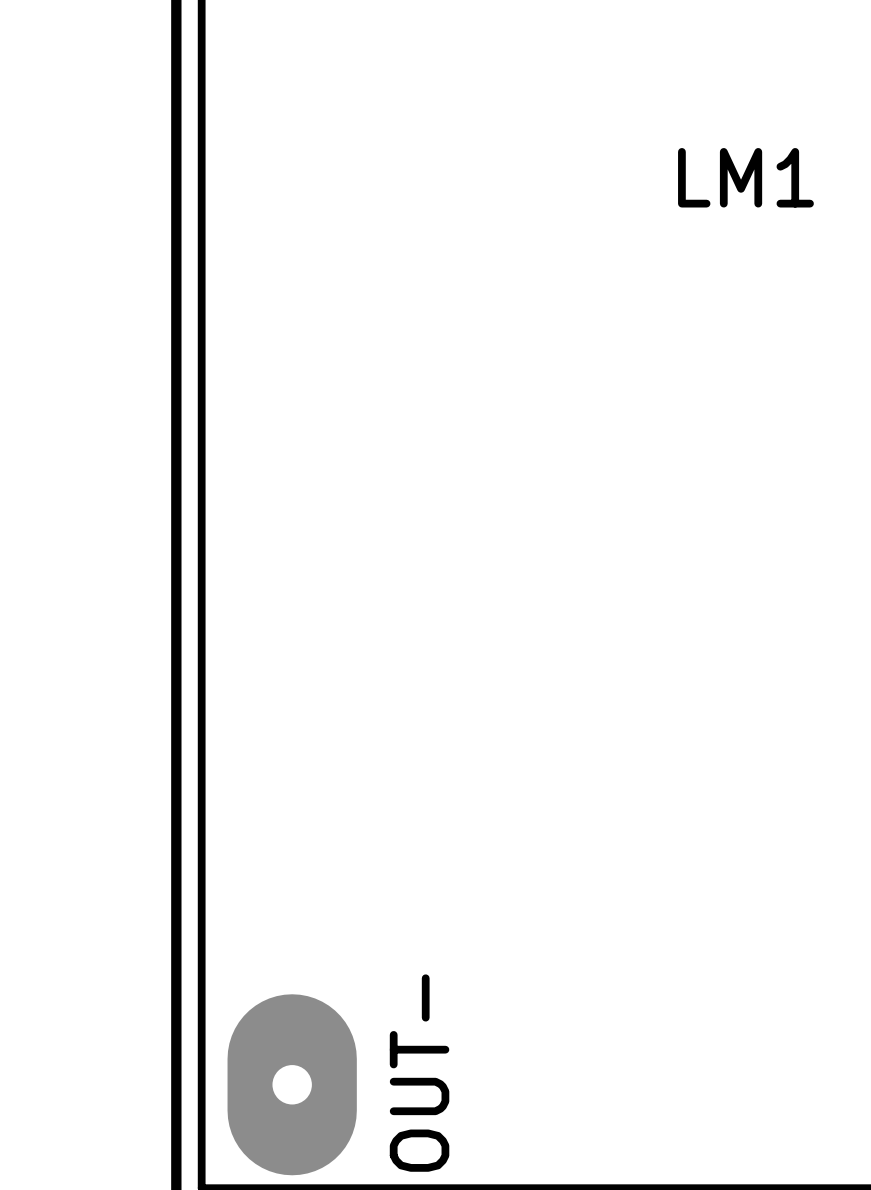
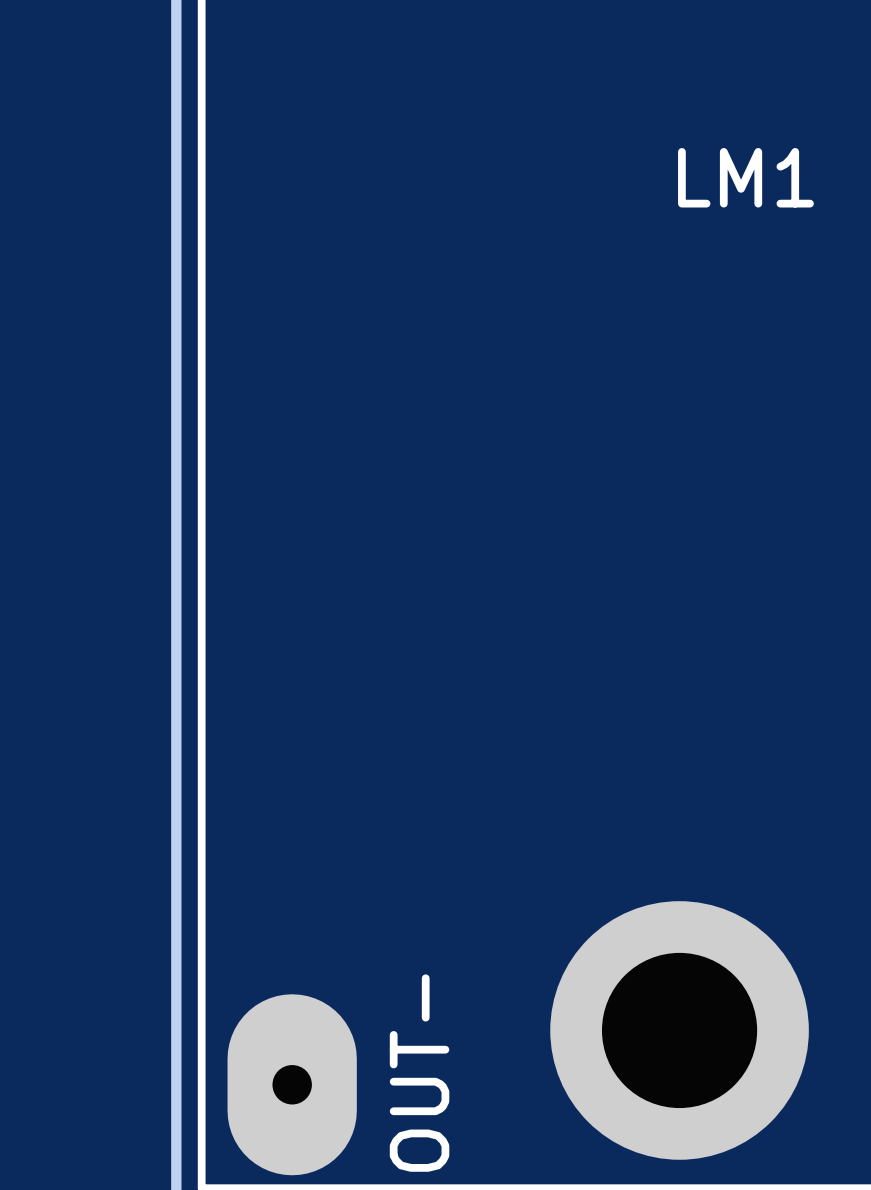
part: none -> (679, 1030)

